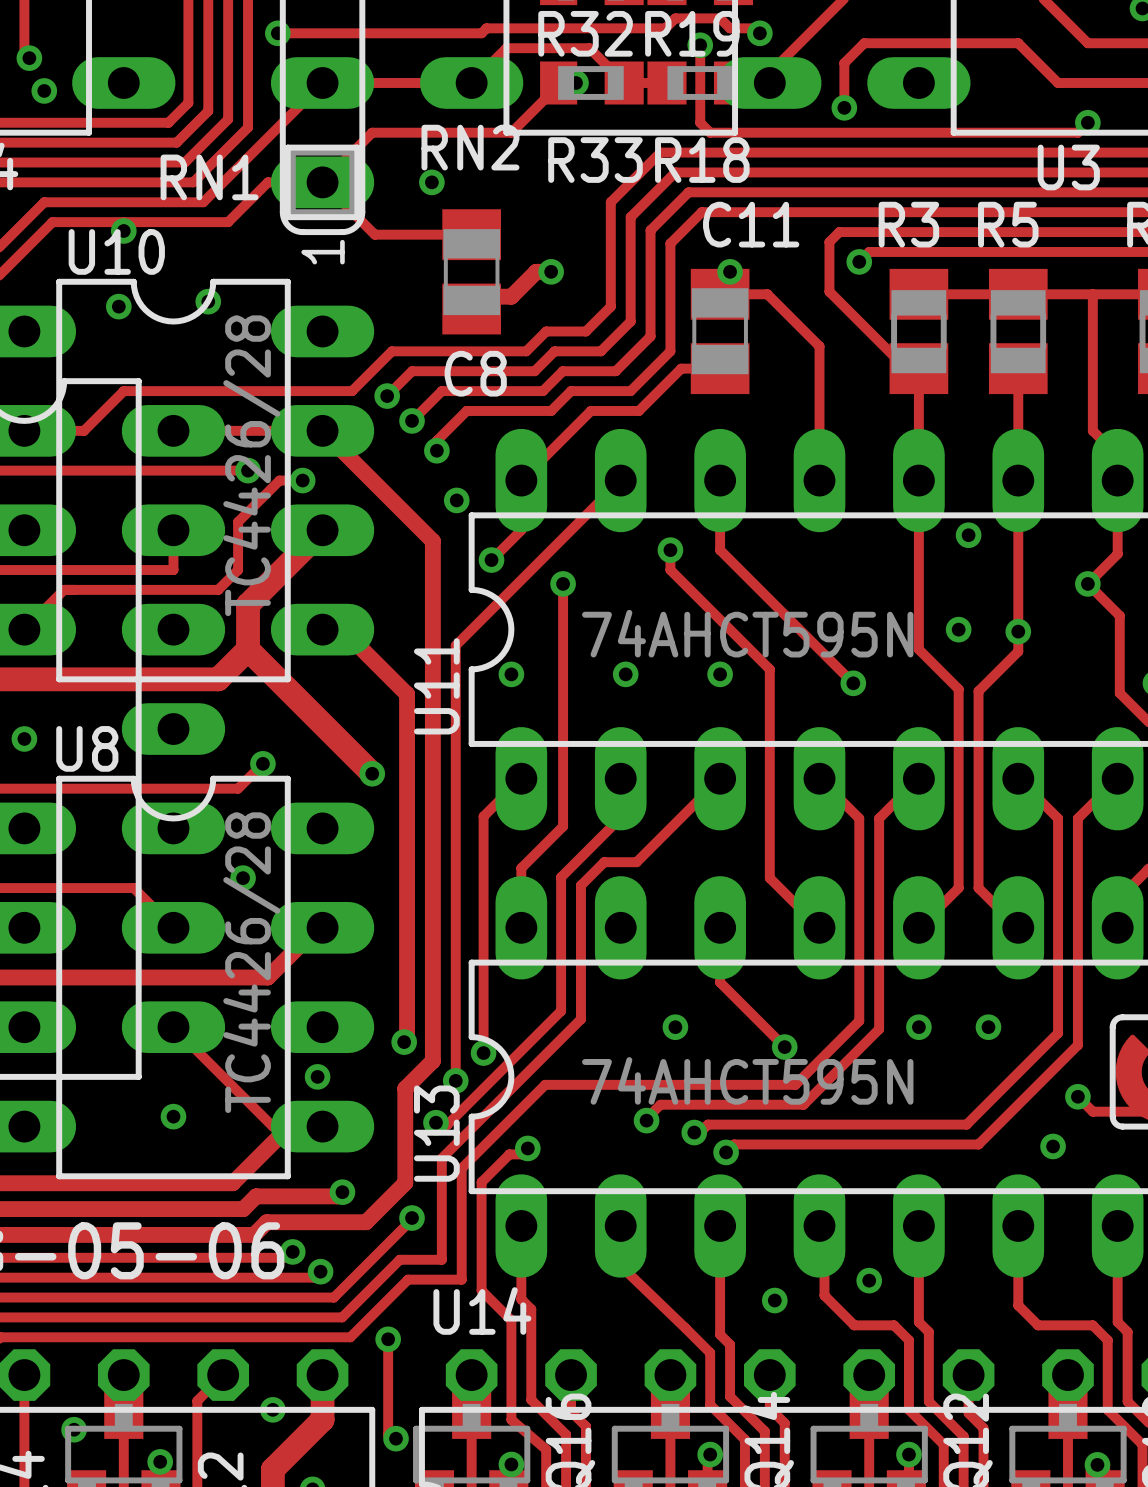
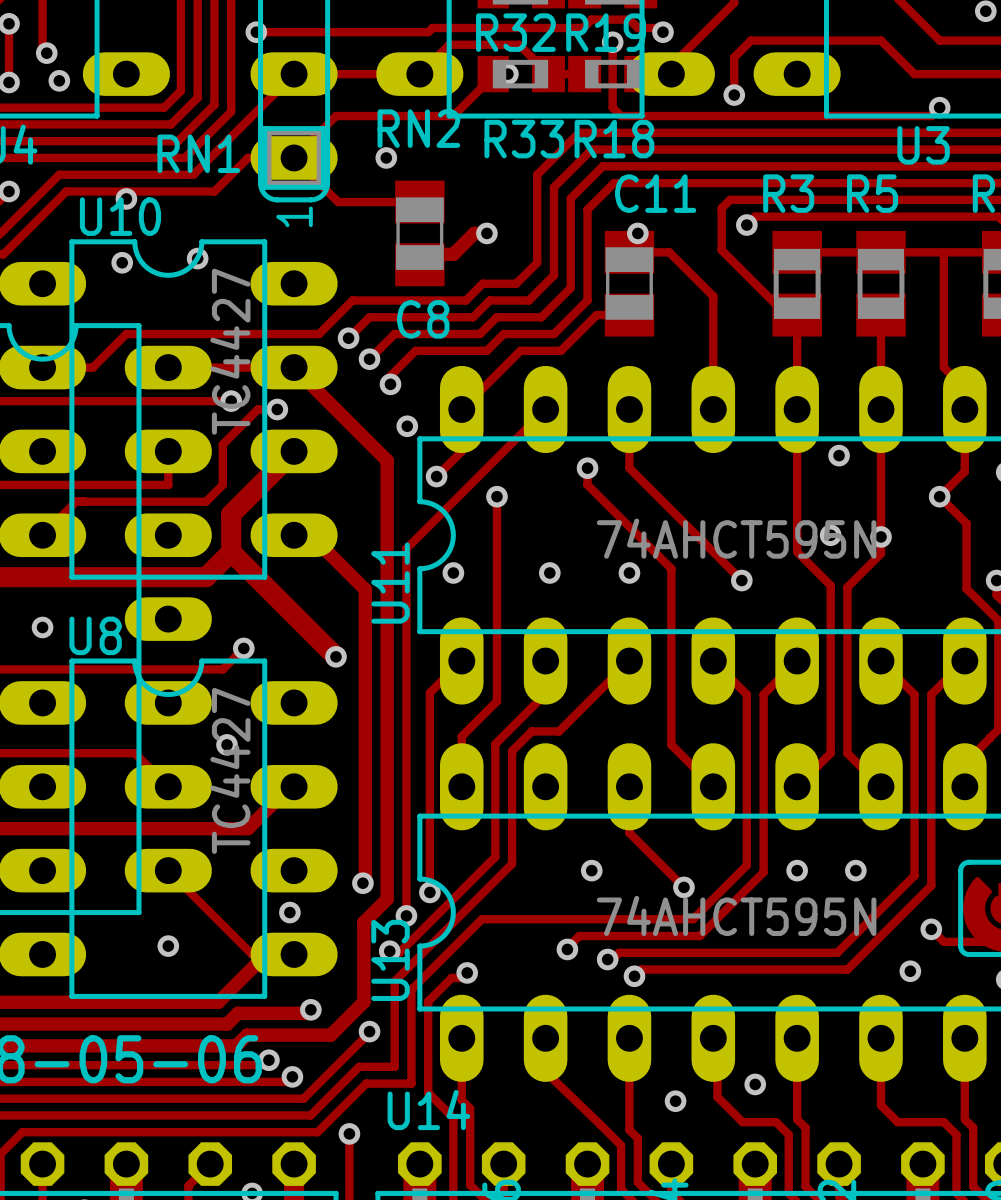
U10 value: TC4426/28 (251, 465) -> TC4427 (230, 351)
U11 value position: 74AHCT595N (747, 633) -> 74AHCT595N (736, 538)
U8 value: TC4426/28 (251, 962) -> TC4427 (230, 770)
U13 value position: 74AHCT595N (747, 1080) -> 74AHCT595N (736, 915)

